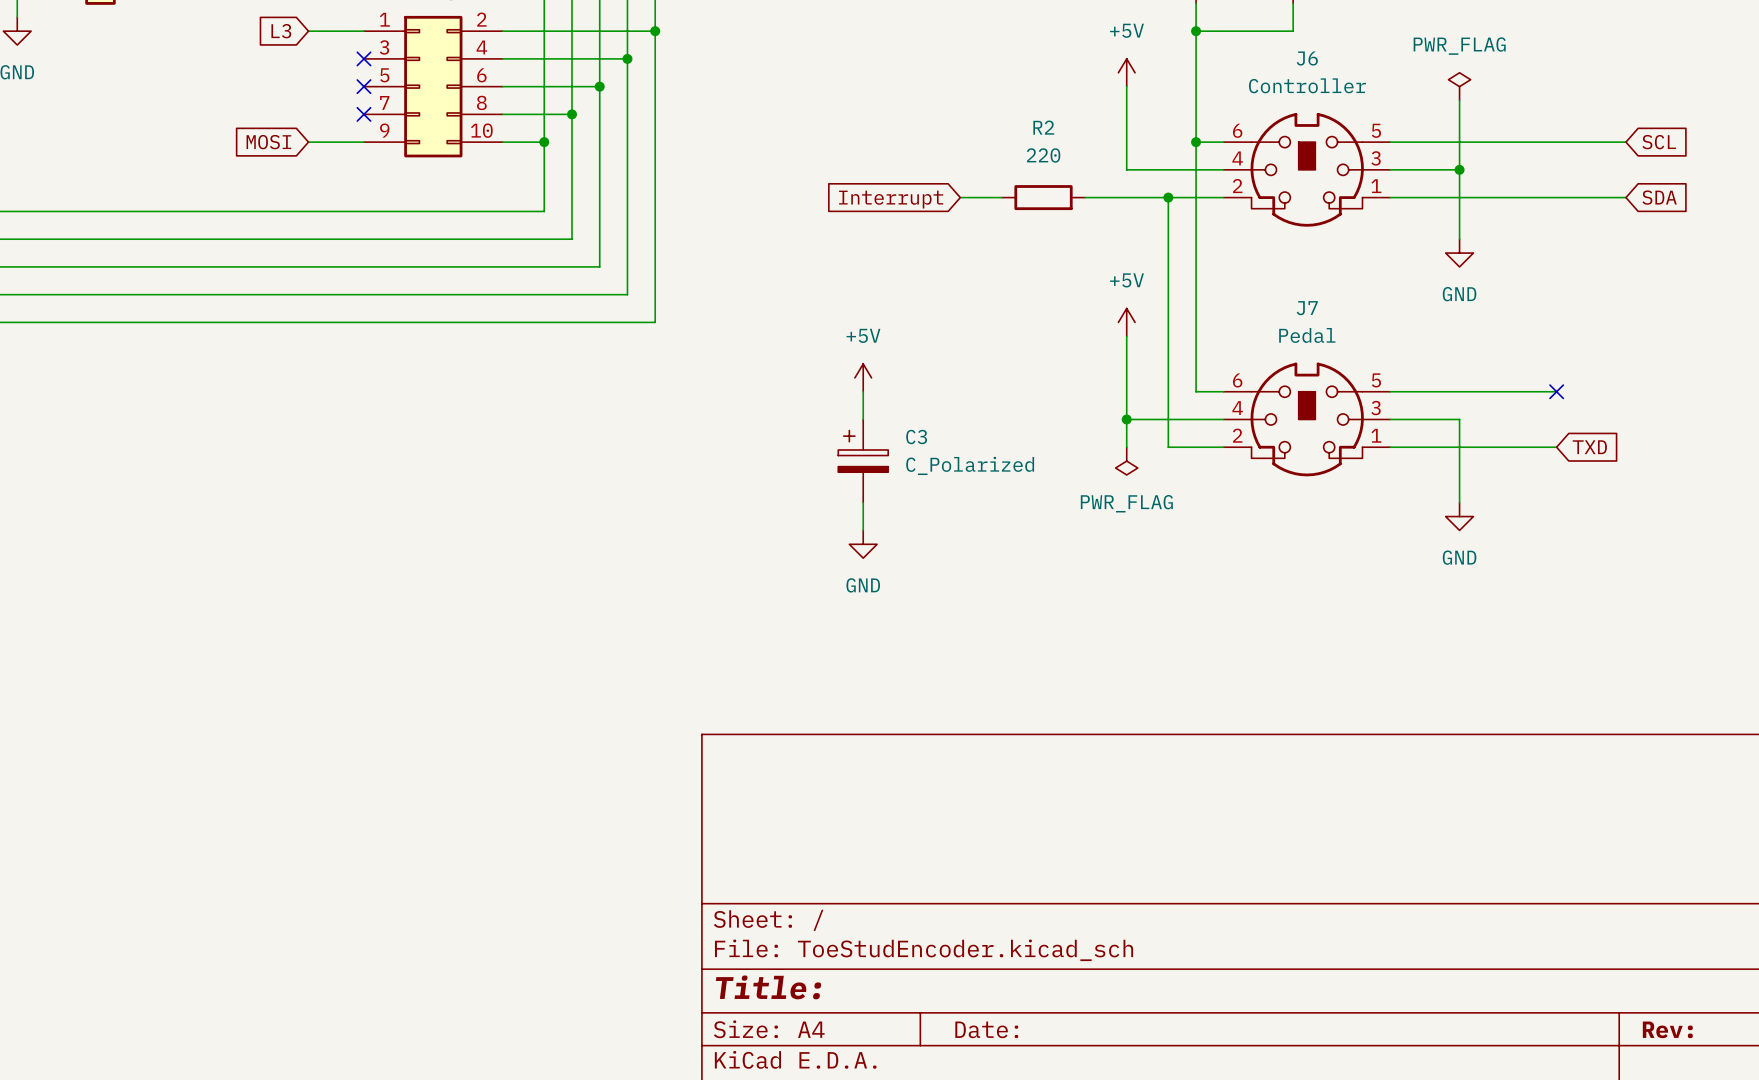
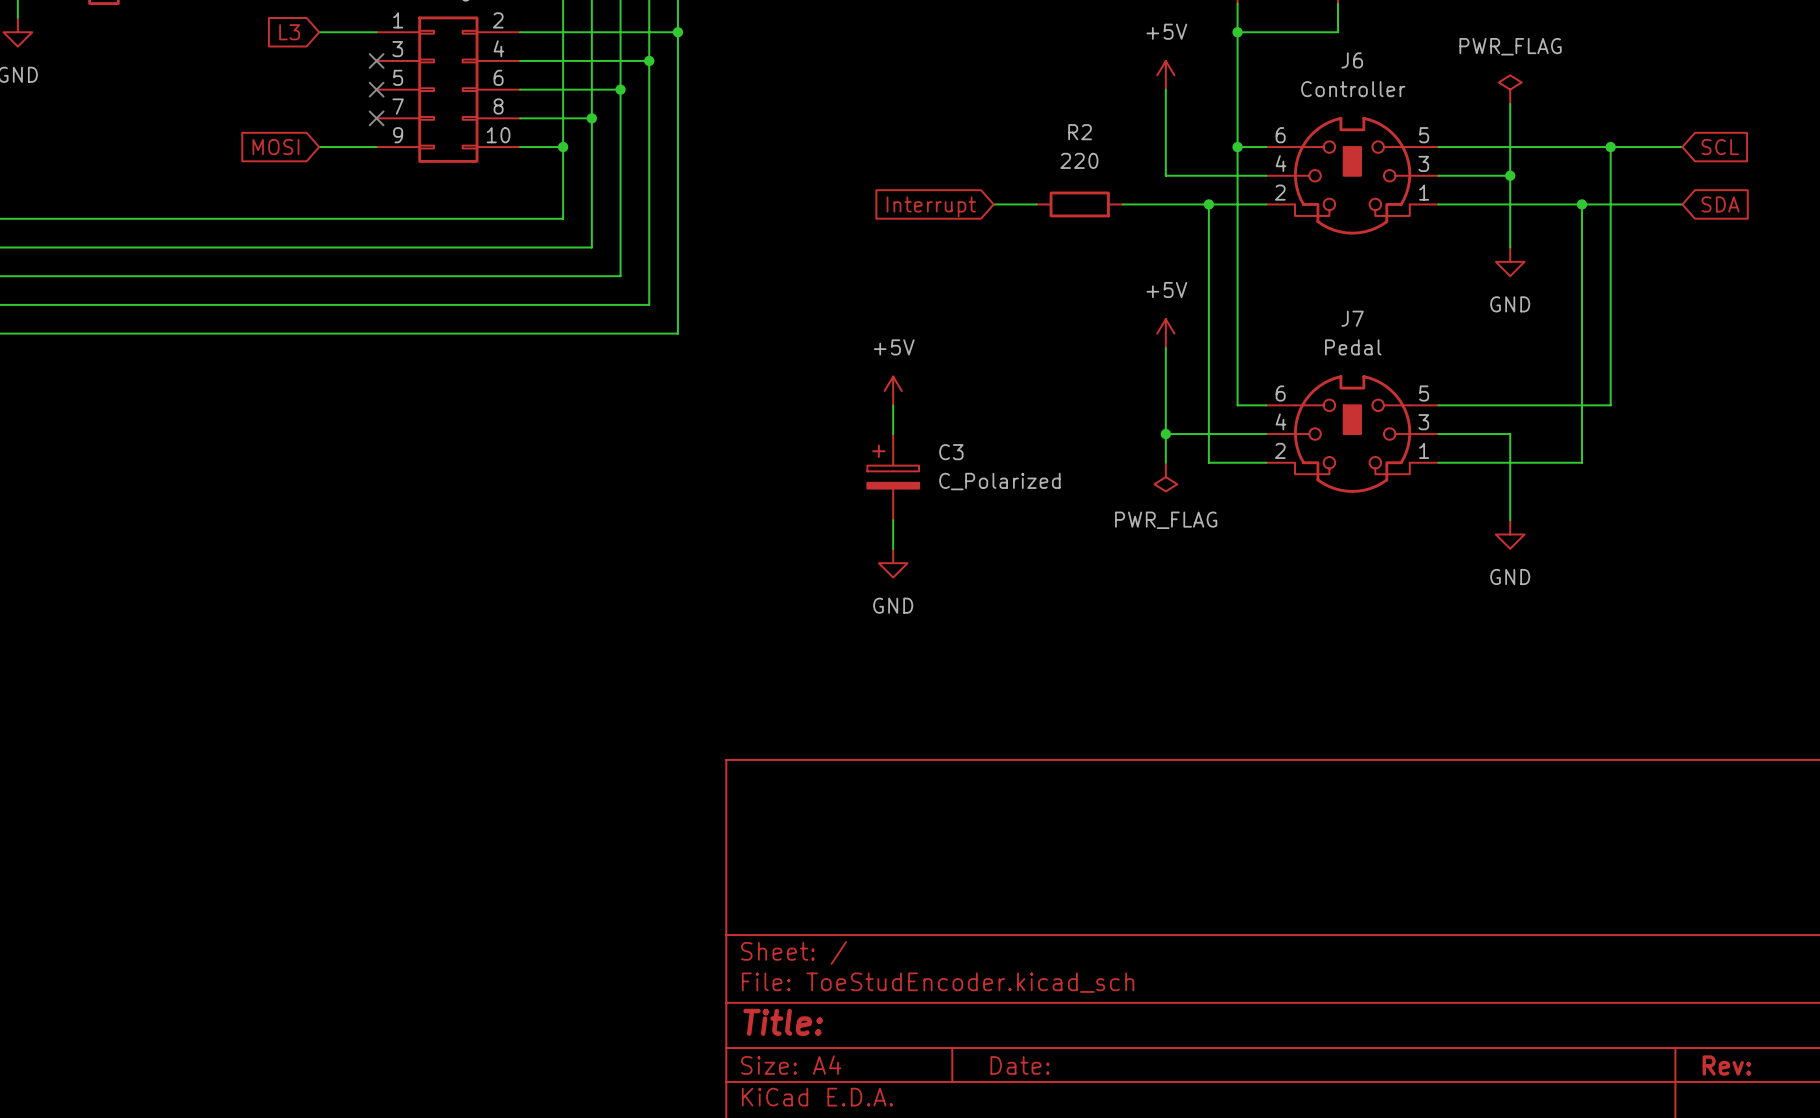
wire: none -> (1610, 147) (1610, 405)
junction: none -> (1610, 147)
junction: none -> (1581, 204)
no-connect mark: (1556, 391) -> none
wire: (1528, 447) (1556, 447) -> (1581, 462) (1581, 204)
global label: TXD (1589, 447) -> none

